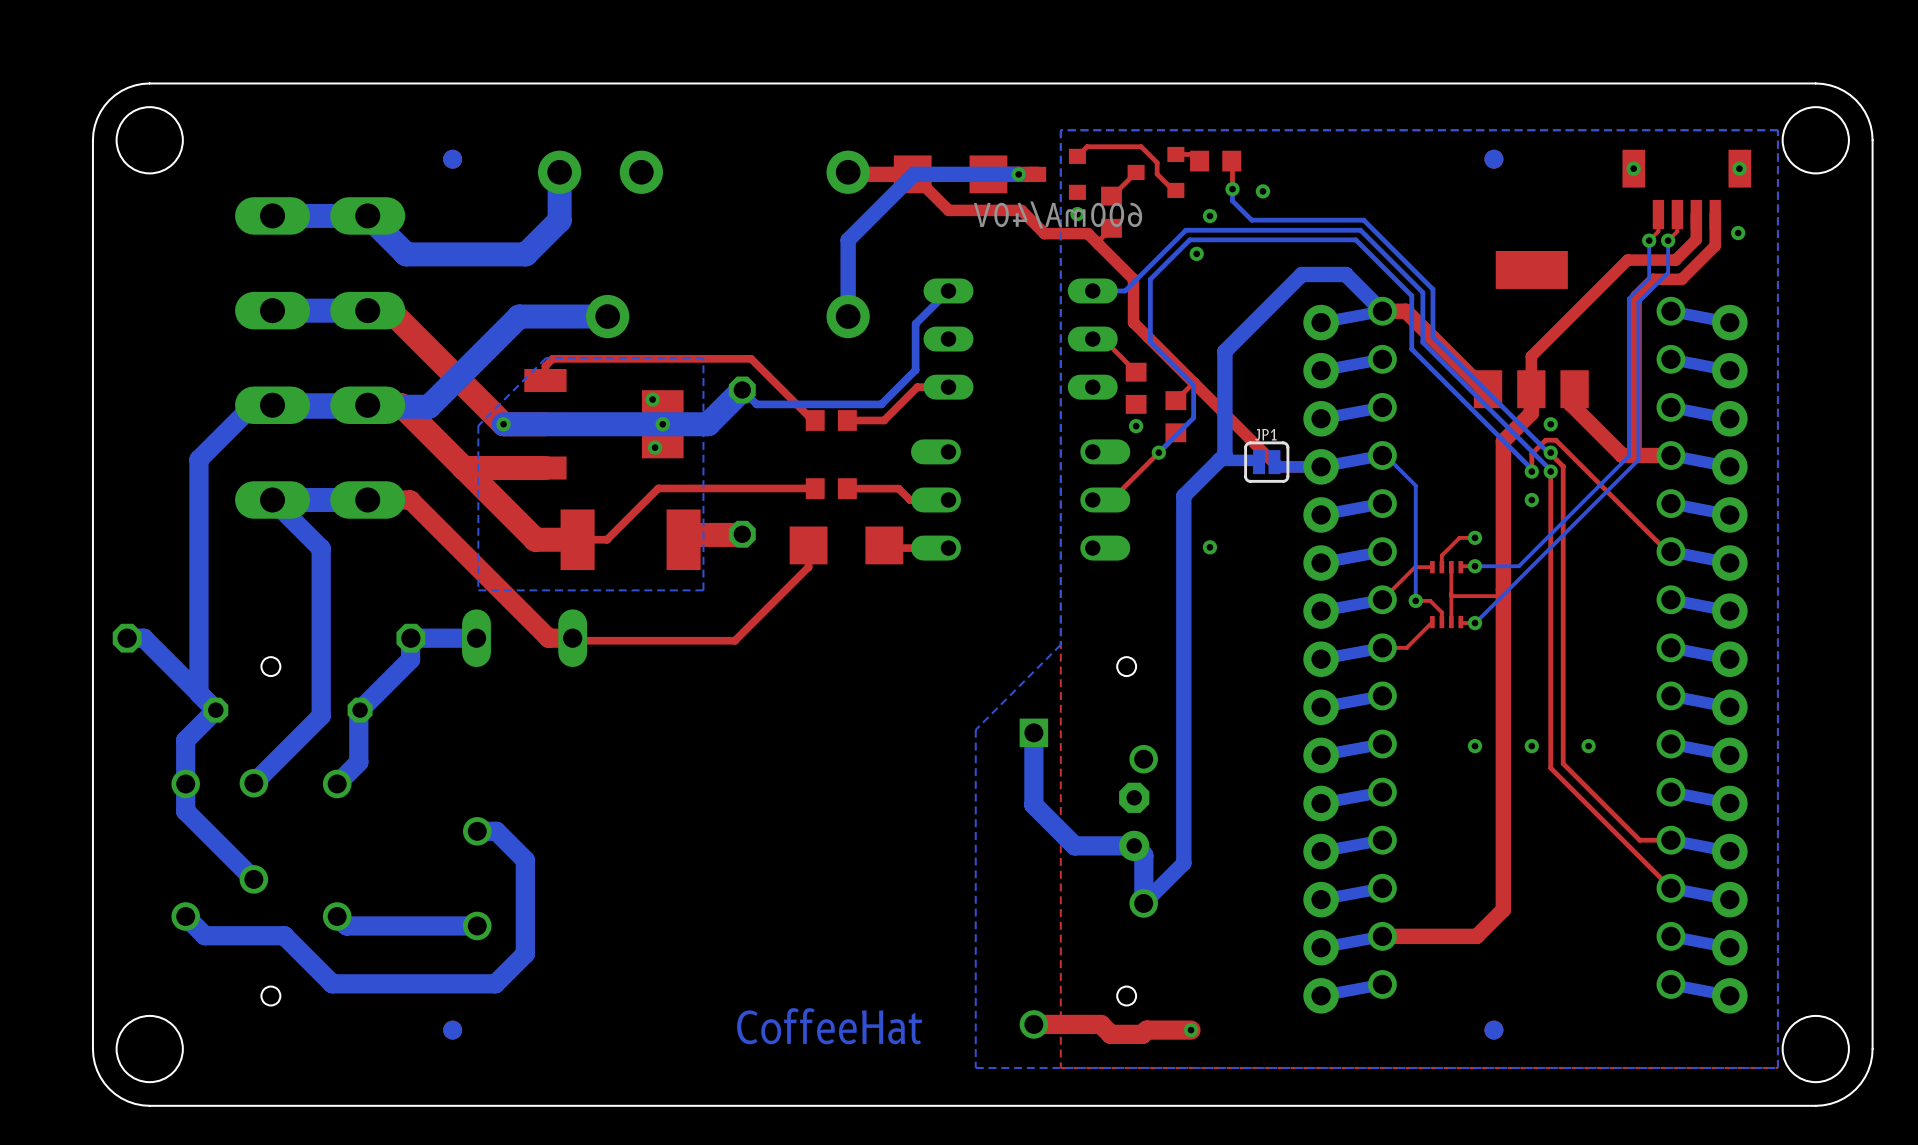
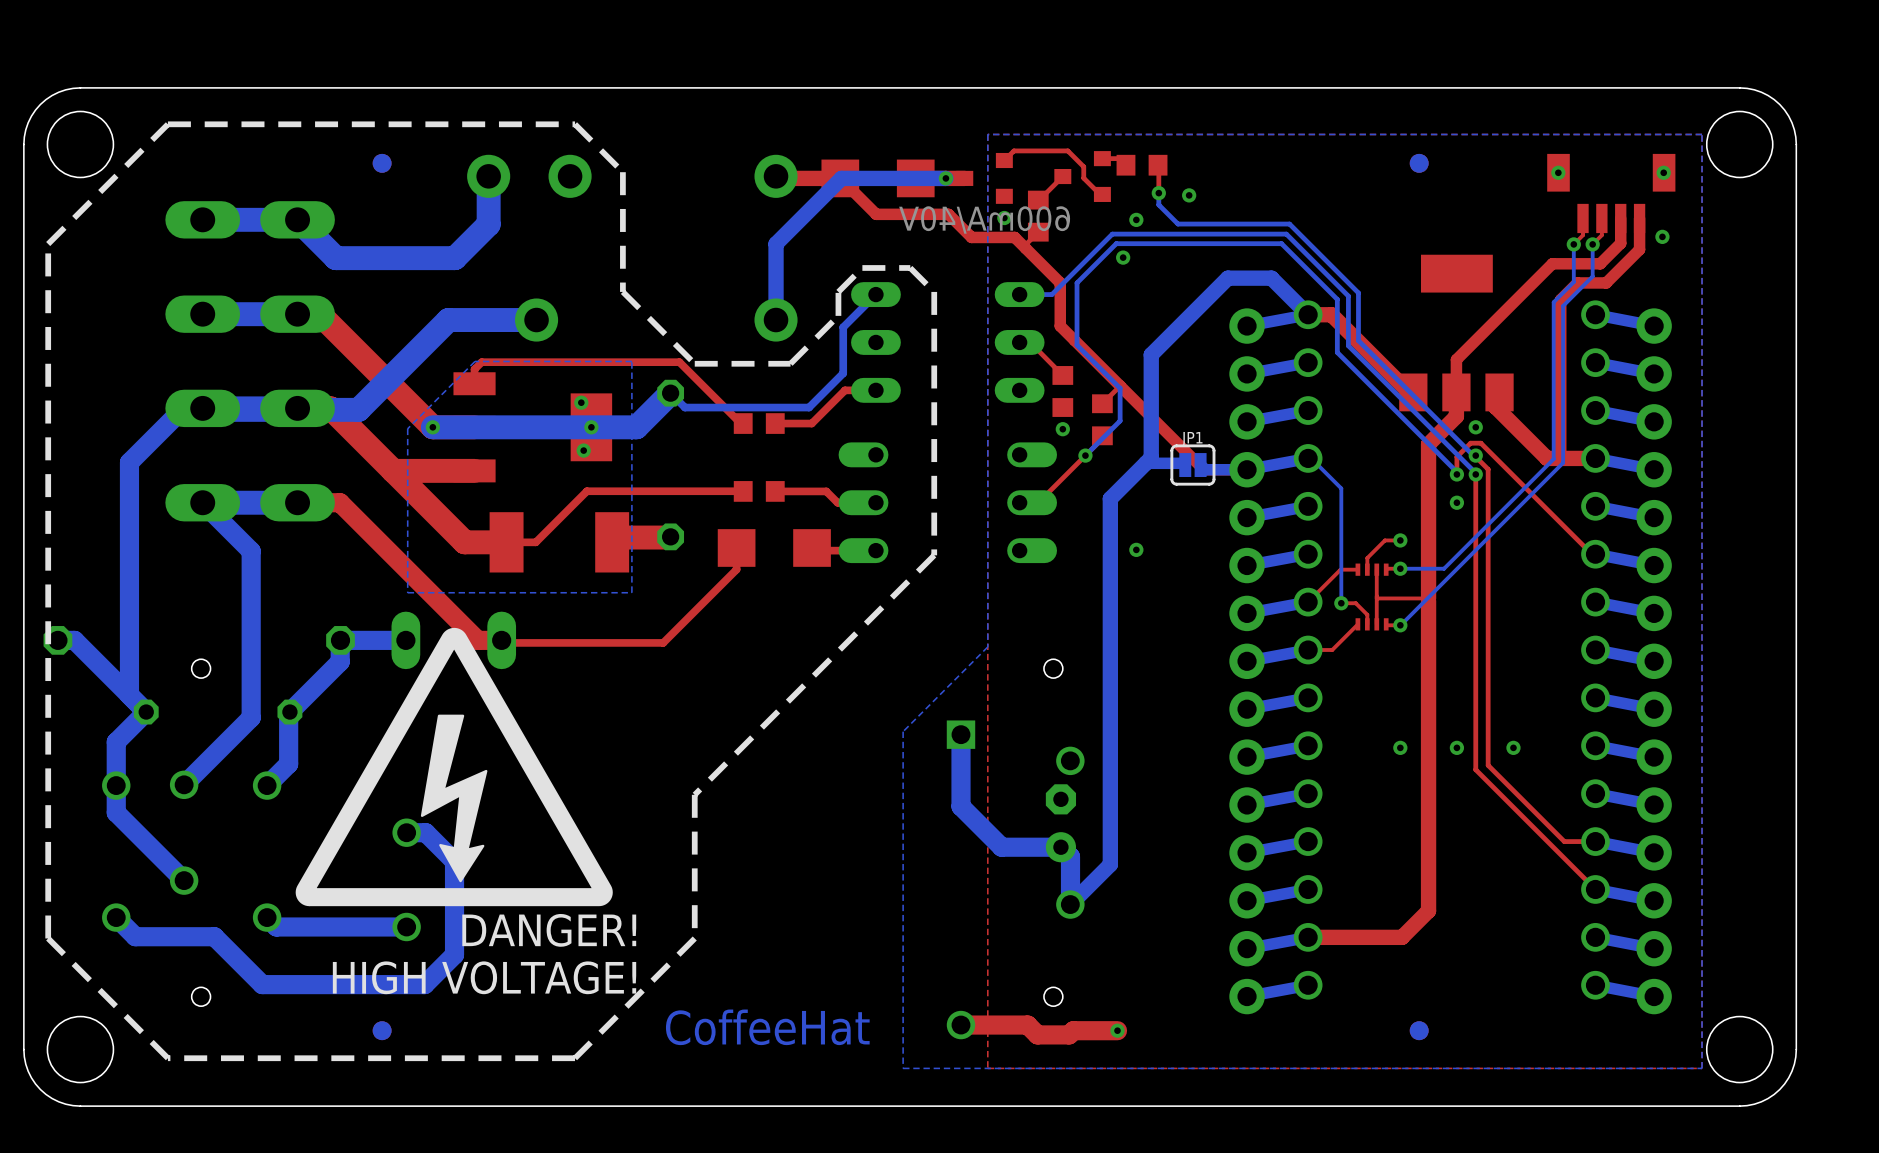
line: none -> (575, 124) (167, 124) (48, 244) (48, 938) (167, 1058) (575, 1058) (694, 938) (694, 794) (934, 555) (934, 291) (910, 267) (862, 267) (838, 291) (838, 315) (790, 363) (694, 363) (622, 291) (622, 172) (575, 124)
drawing: none -> [295, 627, 613, 907]
text: none -> DANGER! (549, 930)
text: none -> HIGH VOLTAGE! (484, 977)

